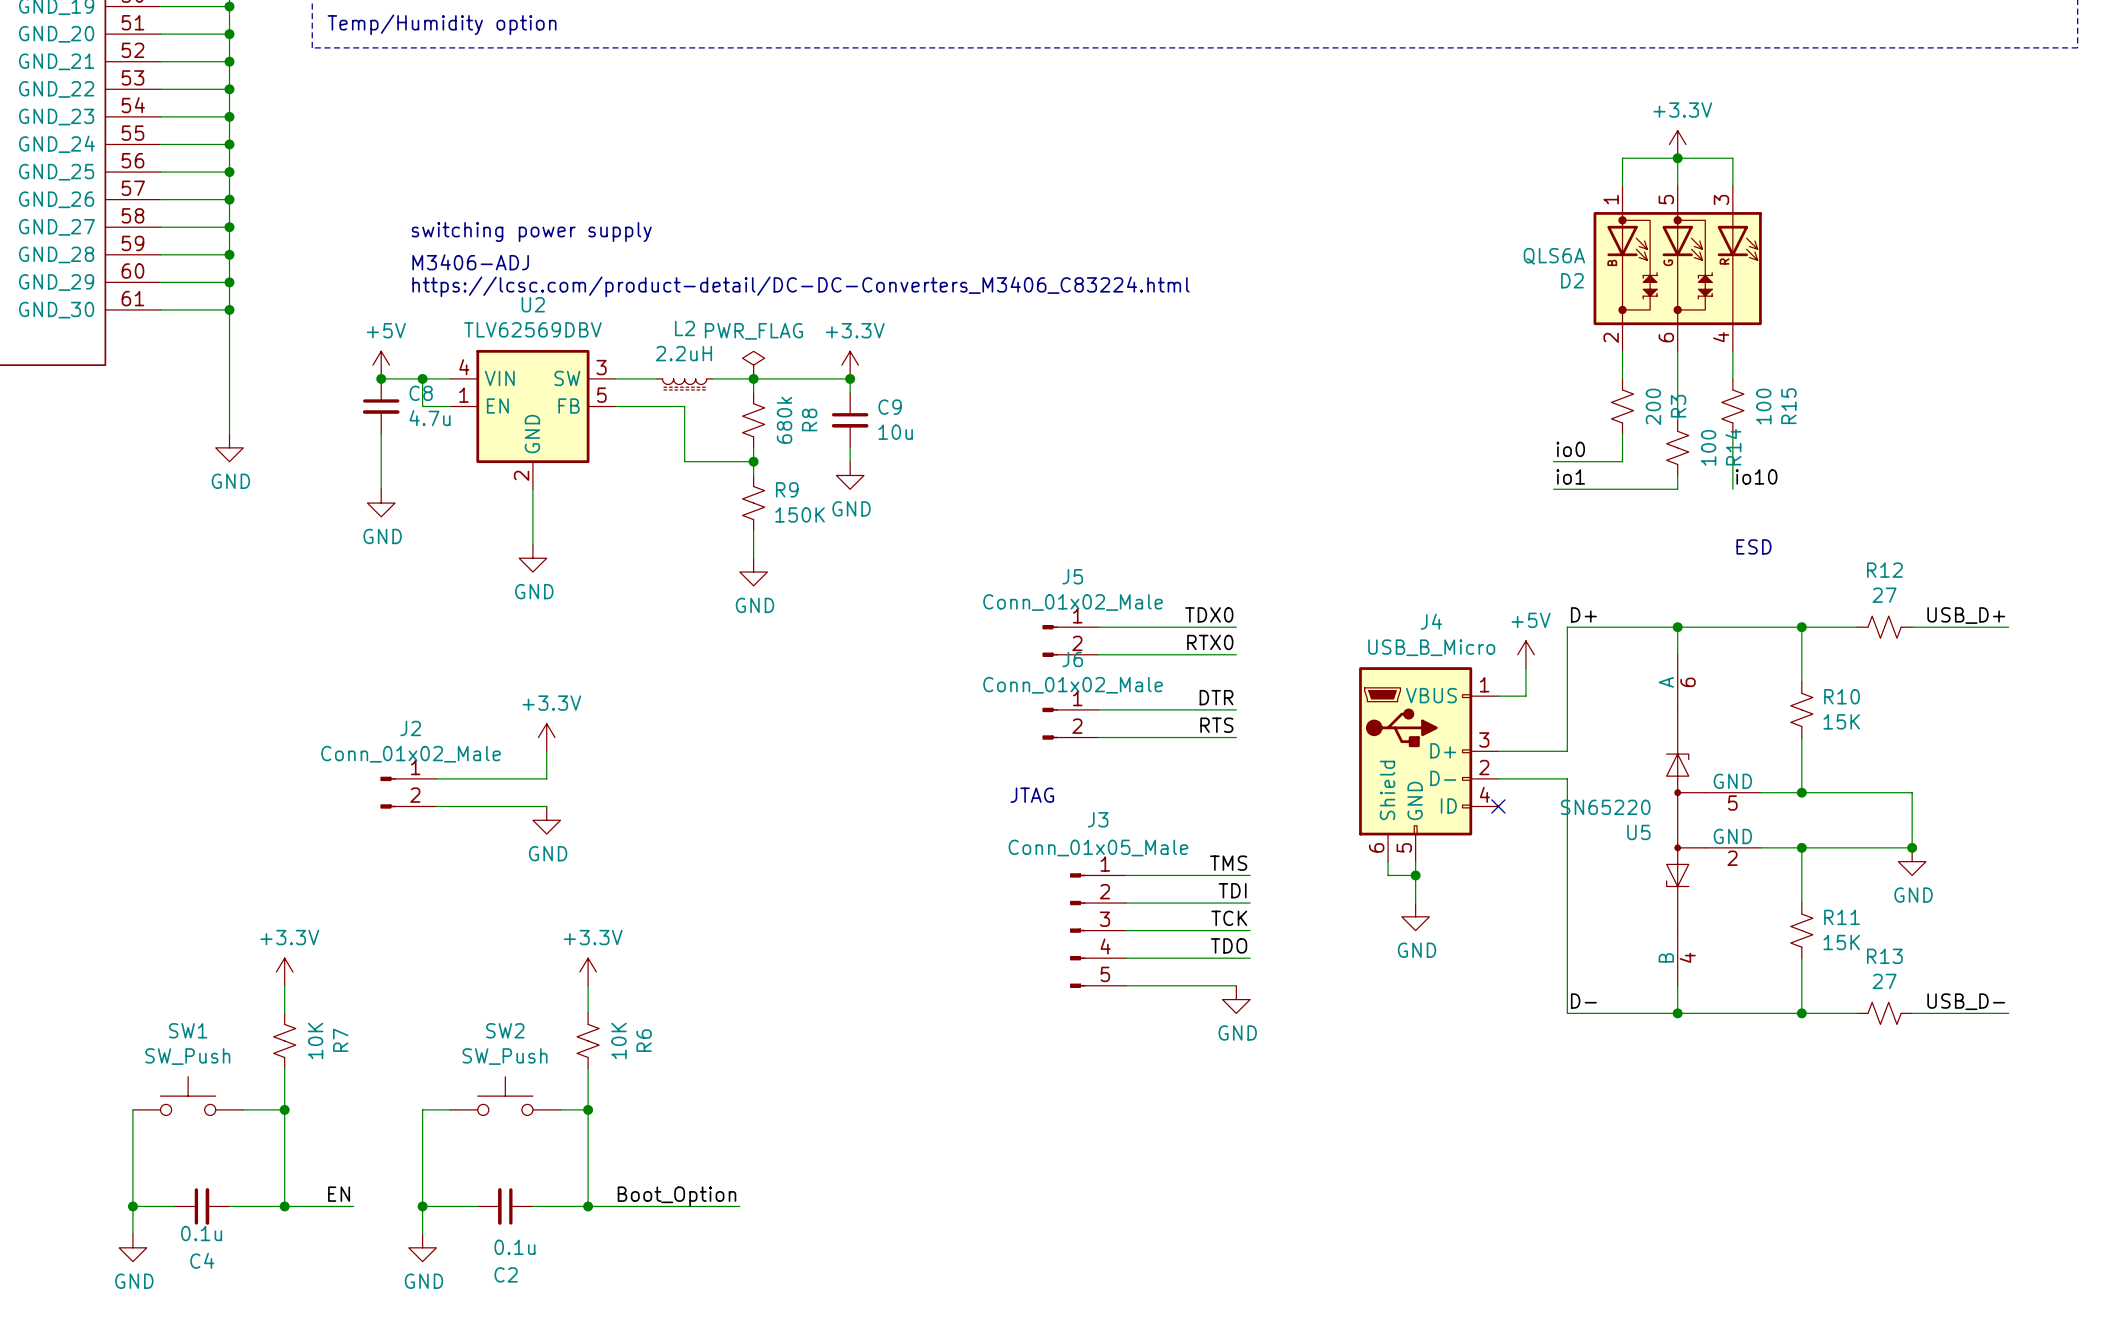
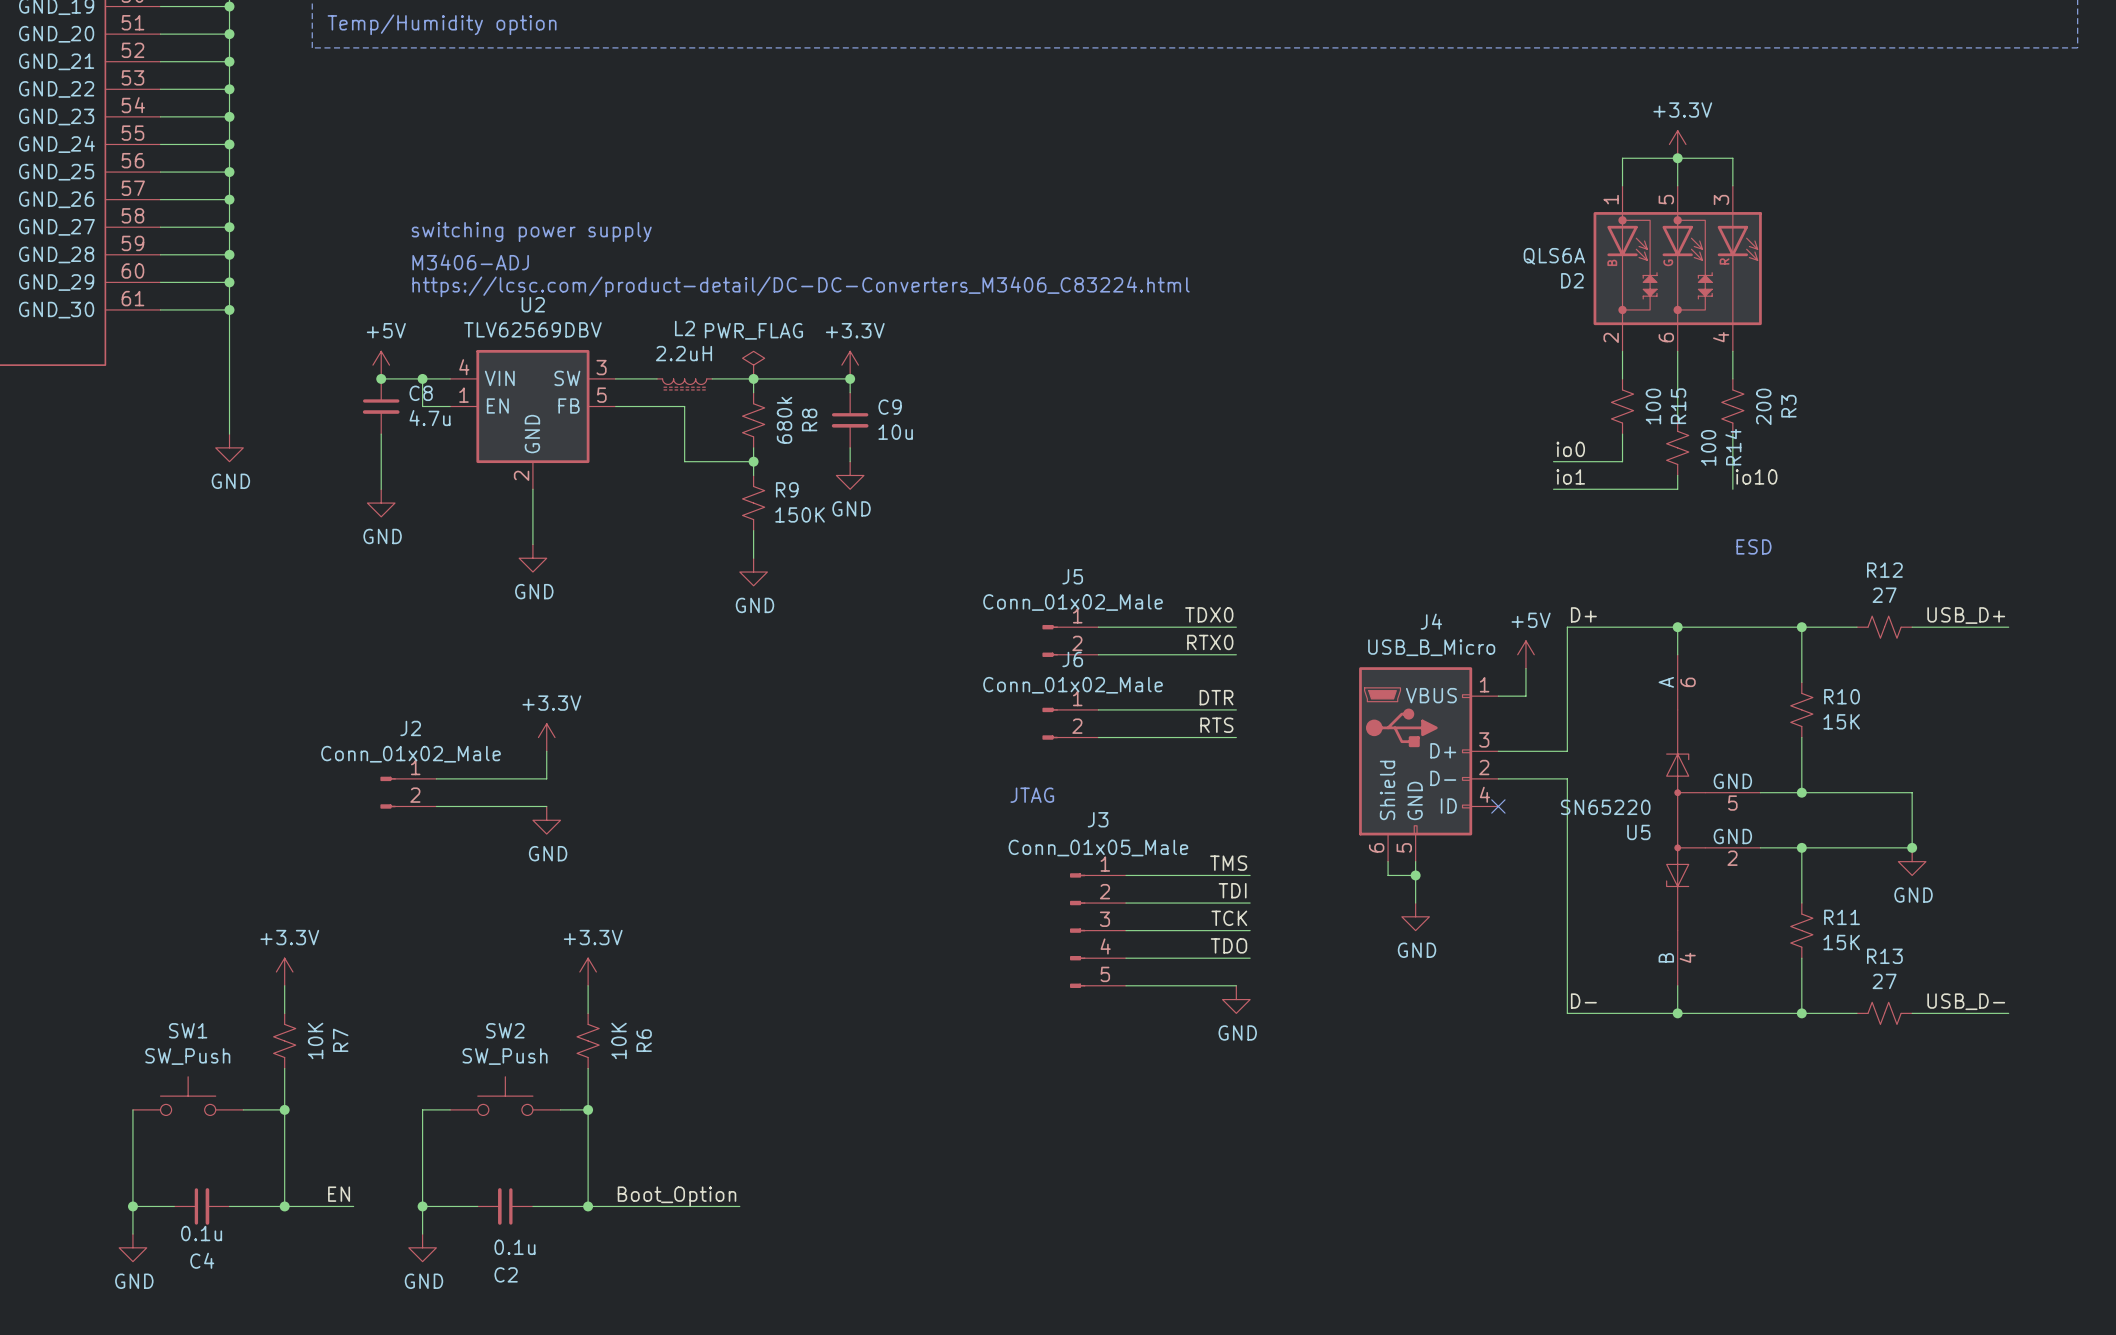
R3 value: 200 (1653, 406) -> 100 (1653, 406)
R3 name: R3 (1678, 406) -> R15 (1678, 406)
R15 value: 100 (1763, 406) -> 200 (1763, 406)
R15 name: R15 (1788, 406) -> R3 (1788, 406)

